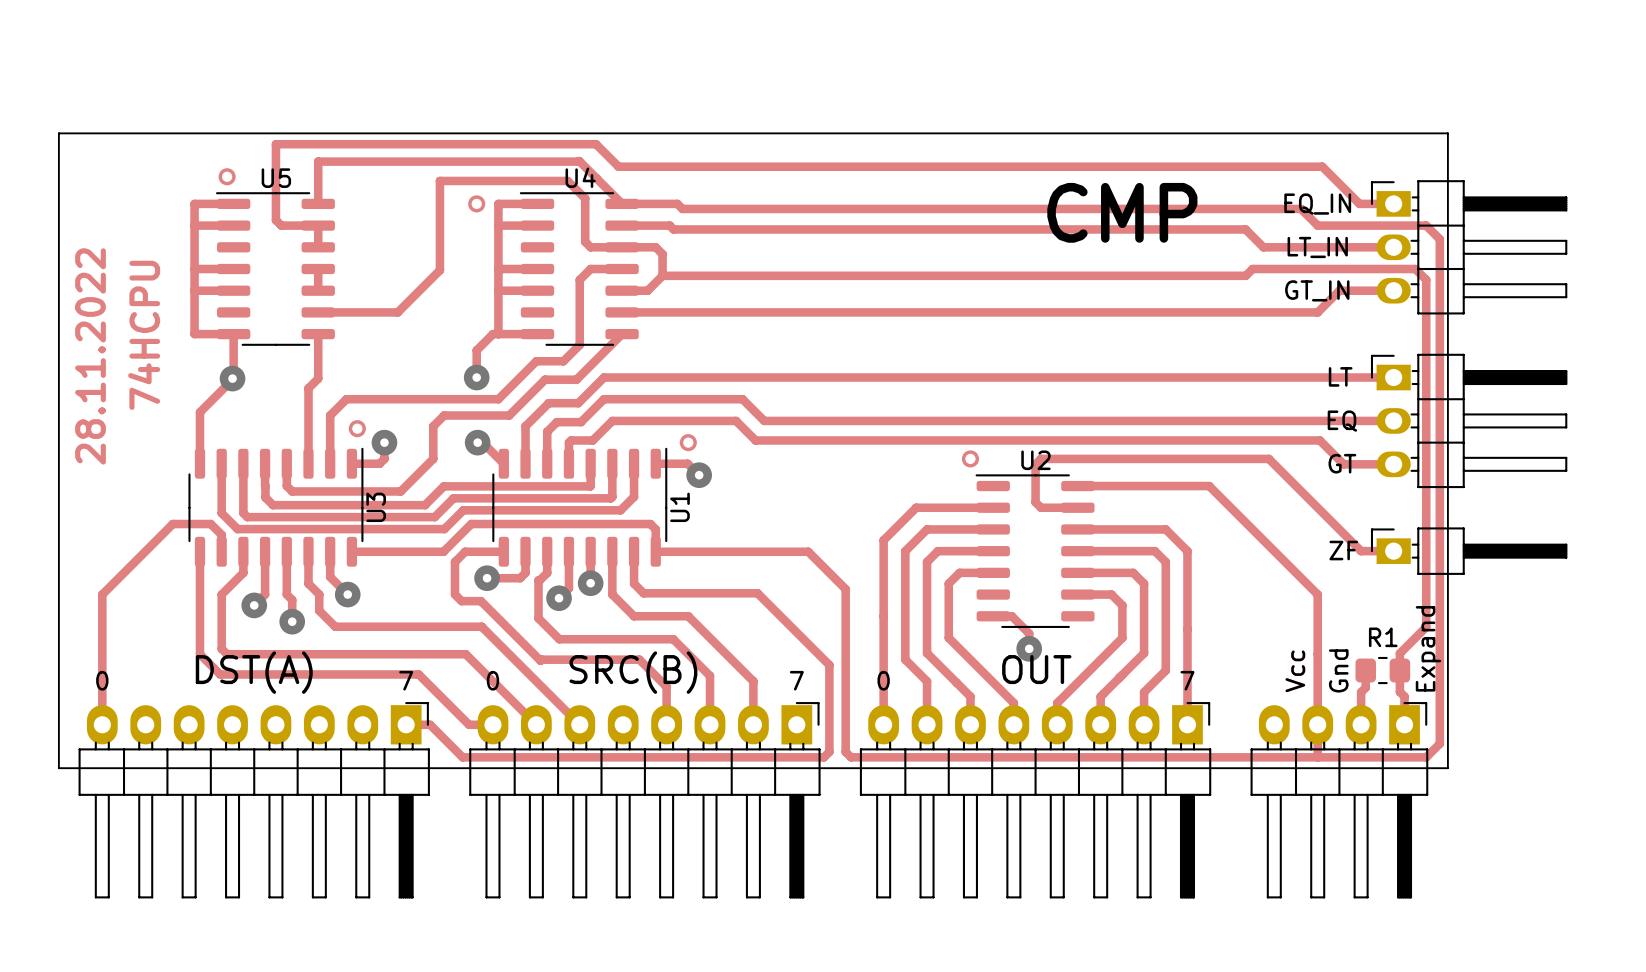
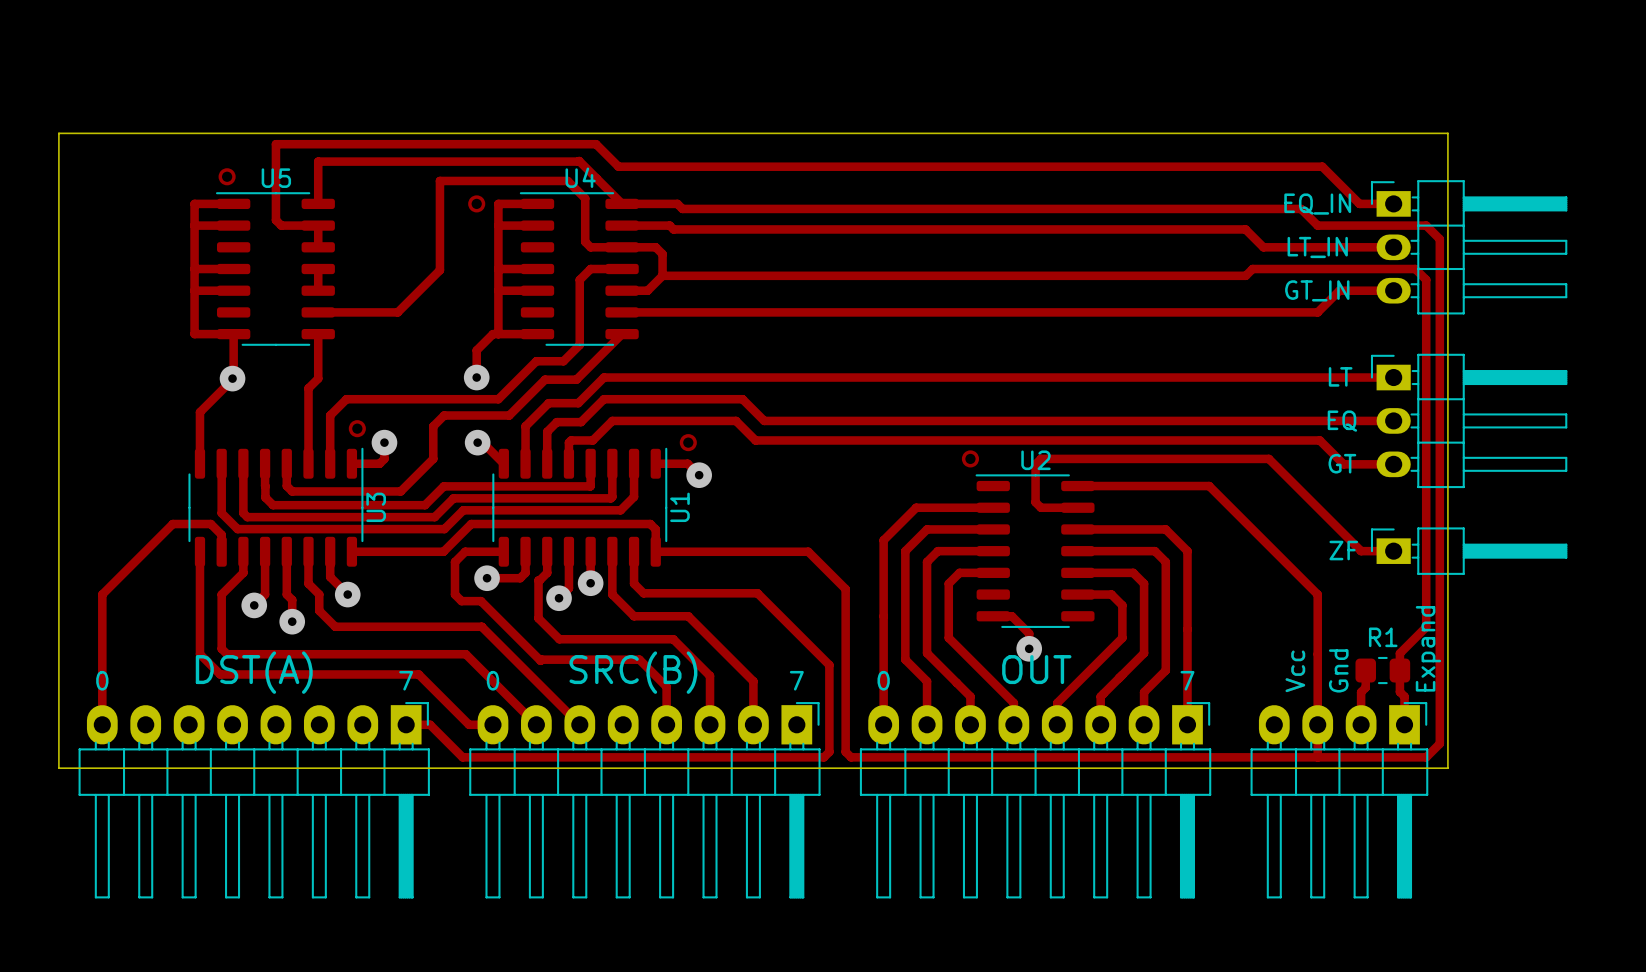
text: CMP (1122, 212) -> none
text: 74HCPU (144, 335) -> none
text: 28.11.2022 (90, 356) -> none

